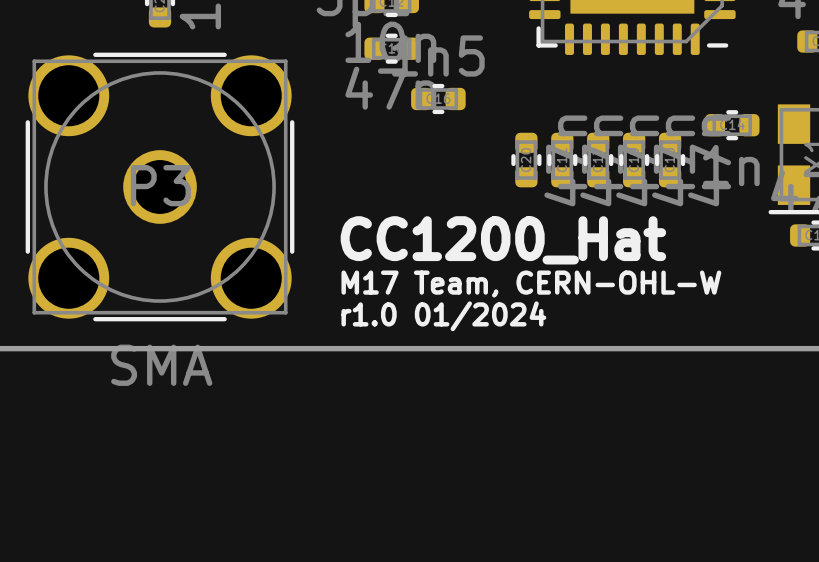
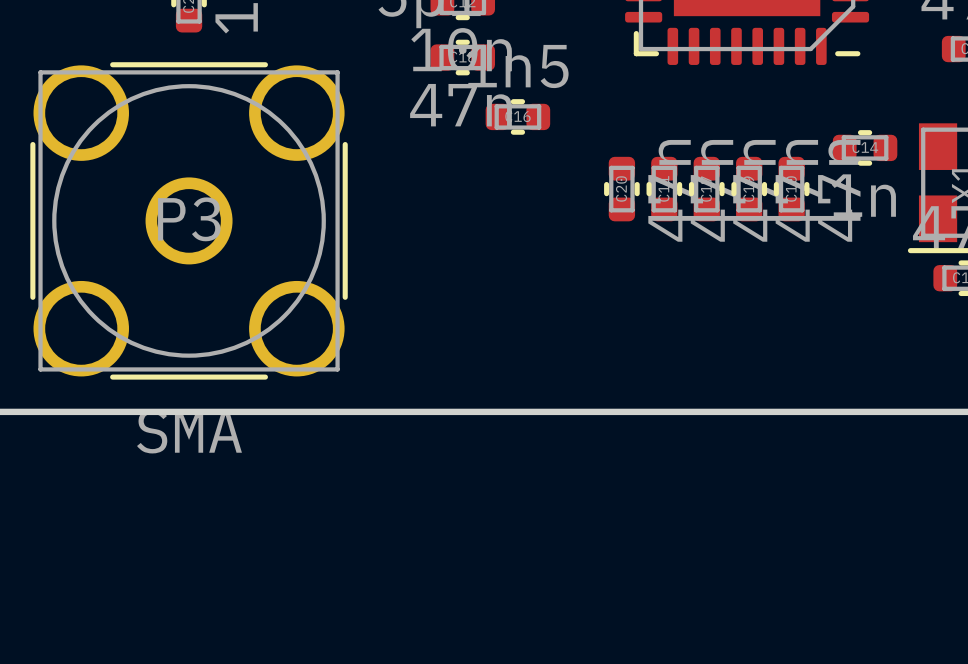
text: CC1200_Hat (503, 240) -> none
text: M17 Team, CERN-OHL-W (531, 284) -> none
text: r1.0 01/2024 (443, 316) -> none

